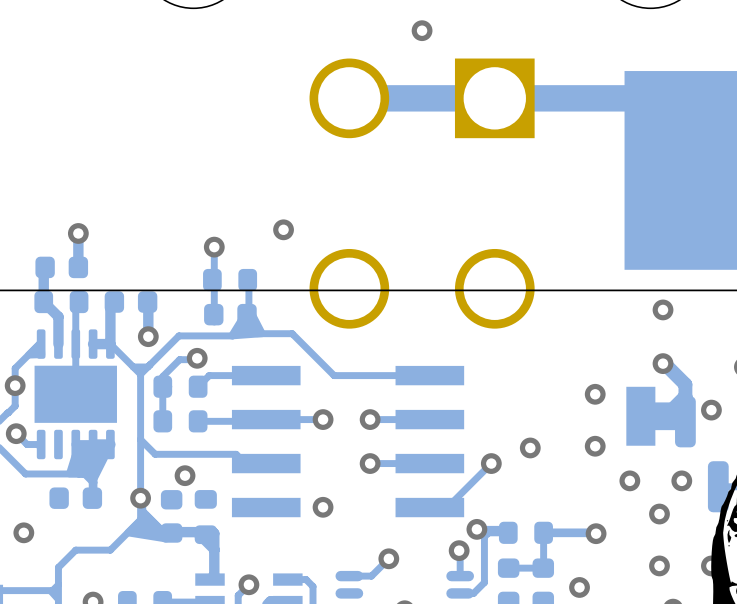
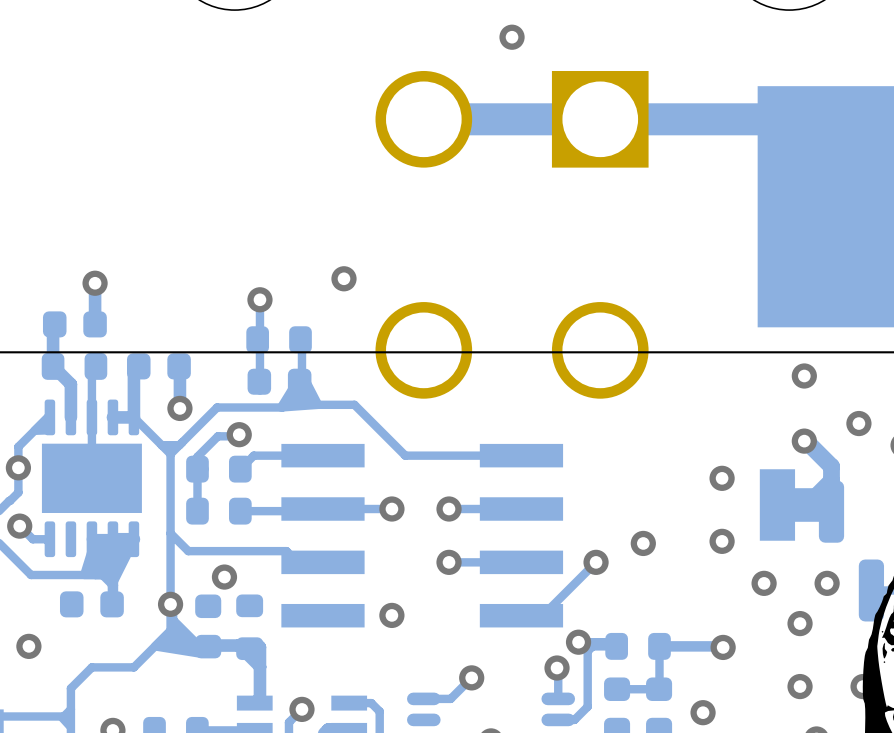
via position: (711, 410) -> (858, 423)

